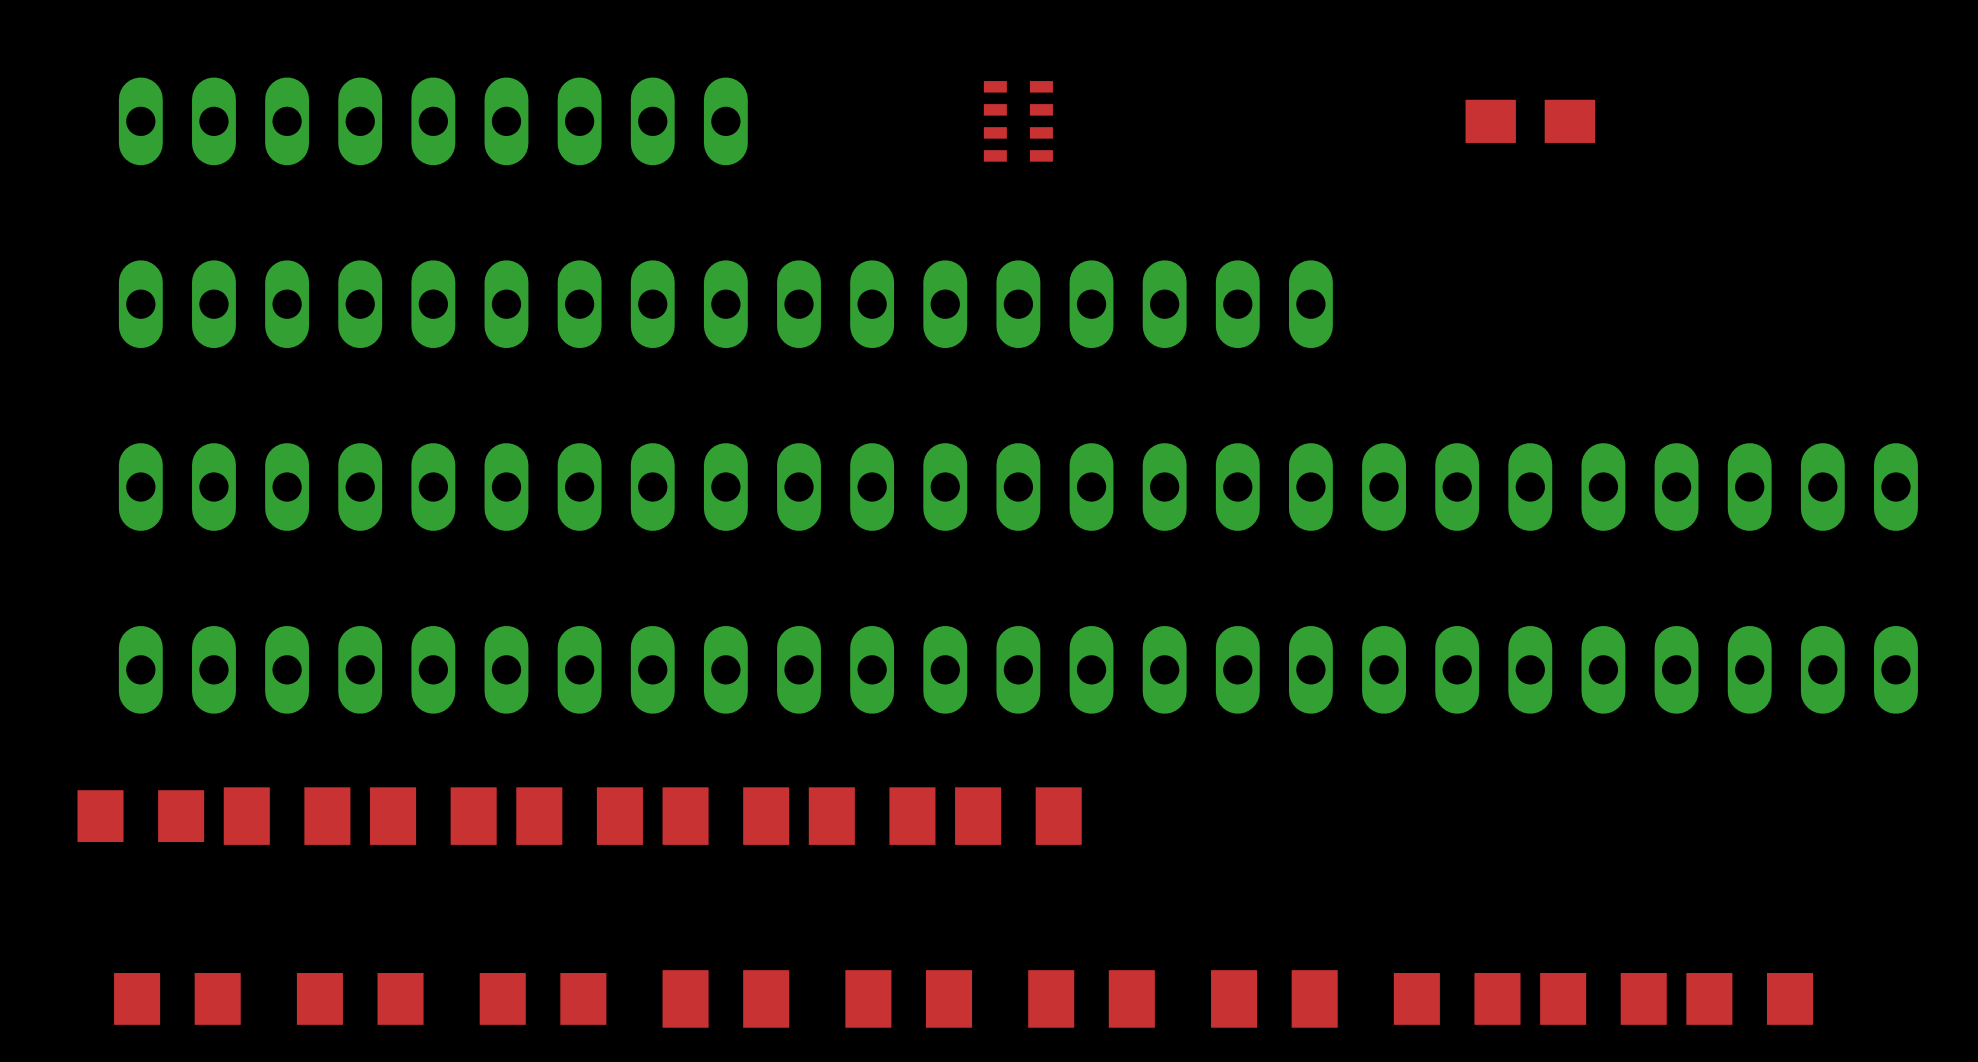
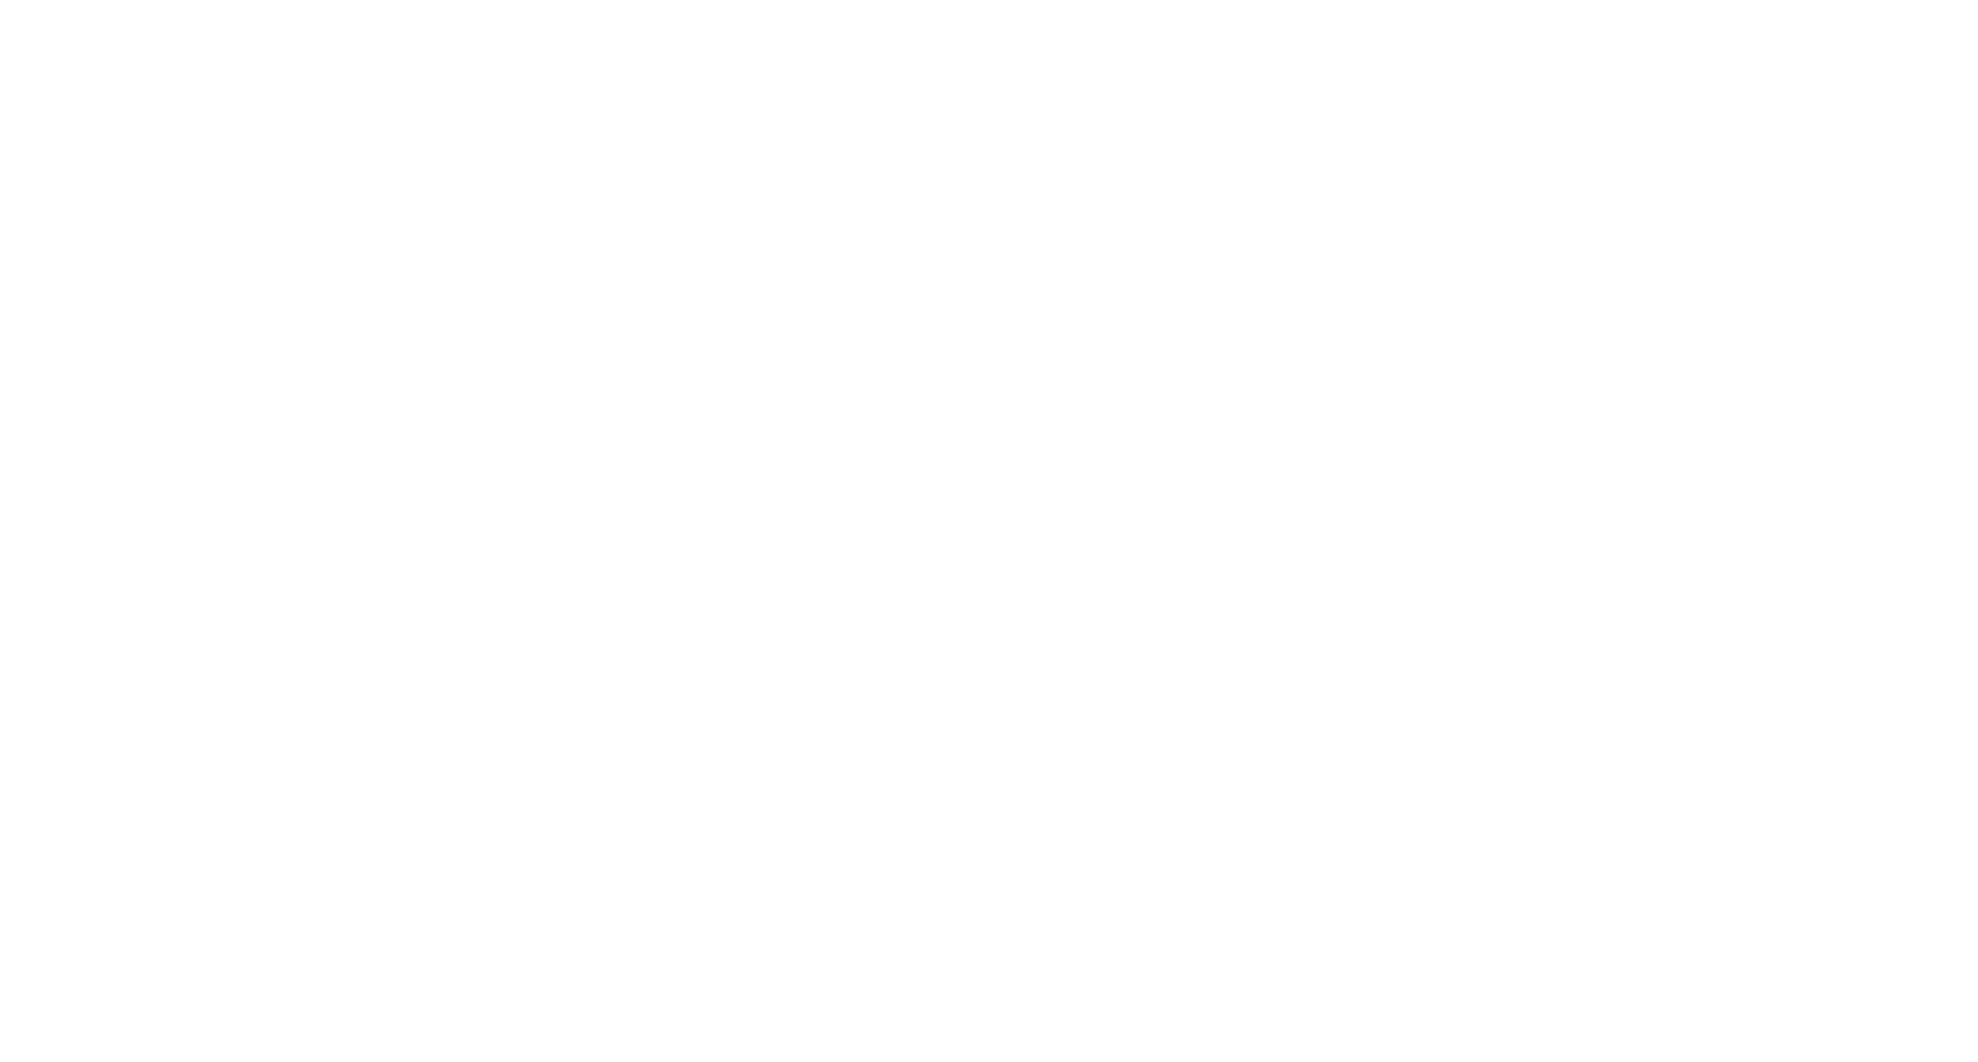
part: (433, 121) -> none
part: (1018, 121) -> none
part: (1530, 121) -> none
part: (725, 304) -> none
part: (1018, 487) -> none
part: (1018, 669) -> none
part: (140, 816) -> none
part: (287, 816) -> none
part: (433, 816) -> none
part: (579, 816) -> none
part: (725, 816) -> none
part: (872, 816) -> none
part: (1018, 816) -> none
part: (177, 998) -> none
part: (360, 998) -> none
part: (543, 998) -> none
part: (725, 998) -> none
part: (908, 998) -> none
part: (1091, 998) -> none
part: (1274, 998) -> none
part: (1457, 998) -> none
part: (1603, 998) -> none
part: (1749, 998) -> none

